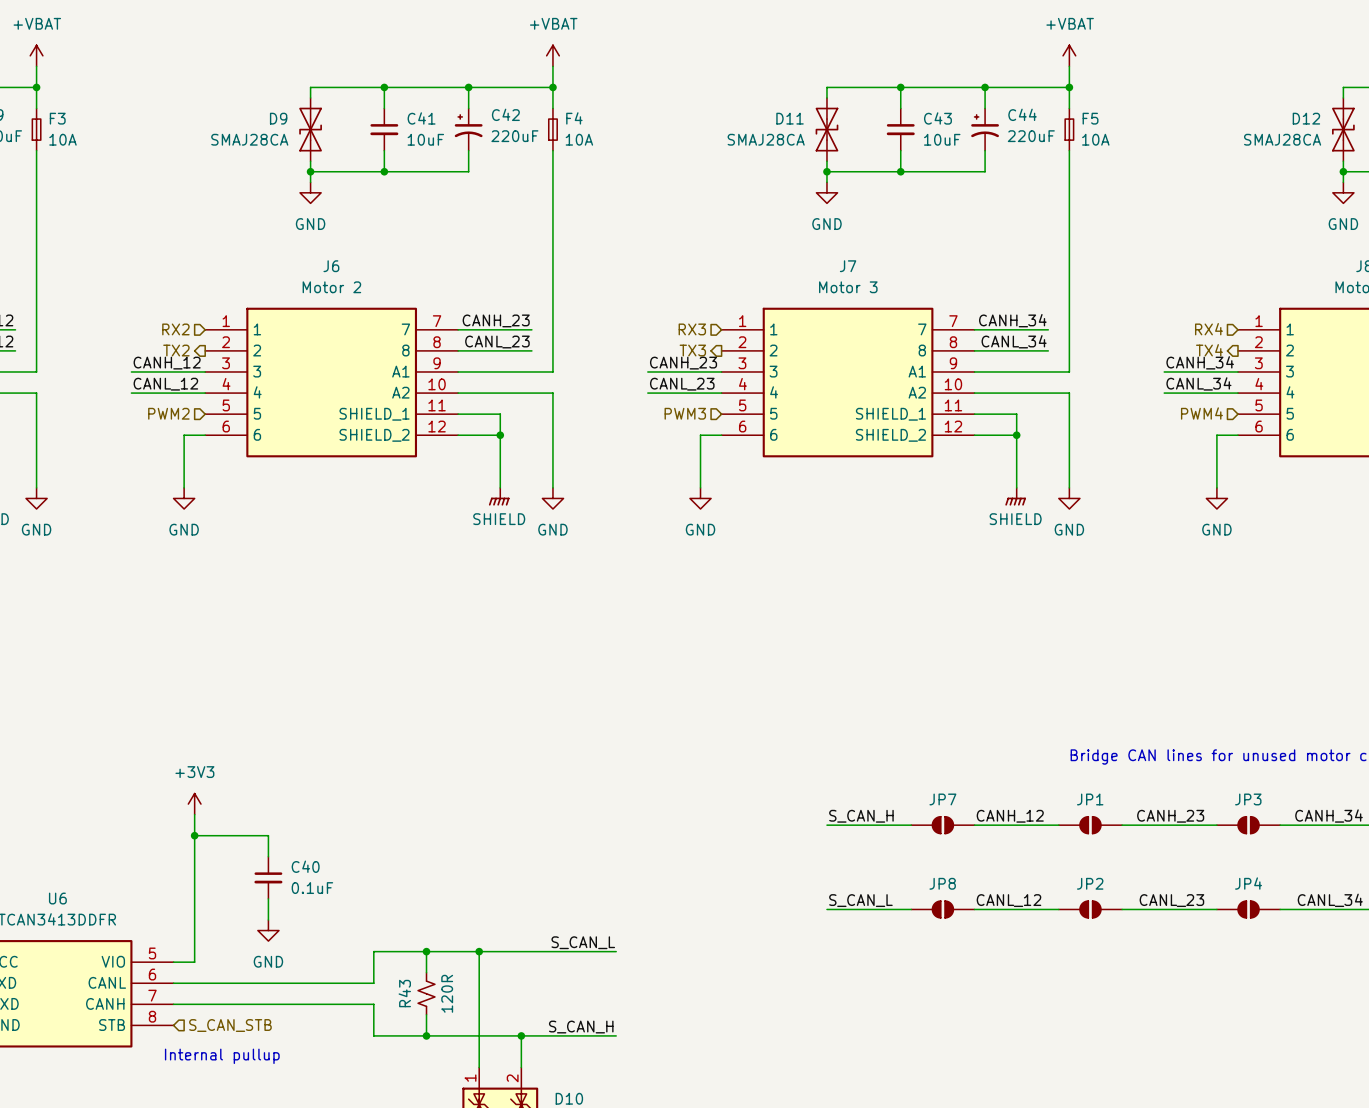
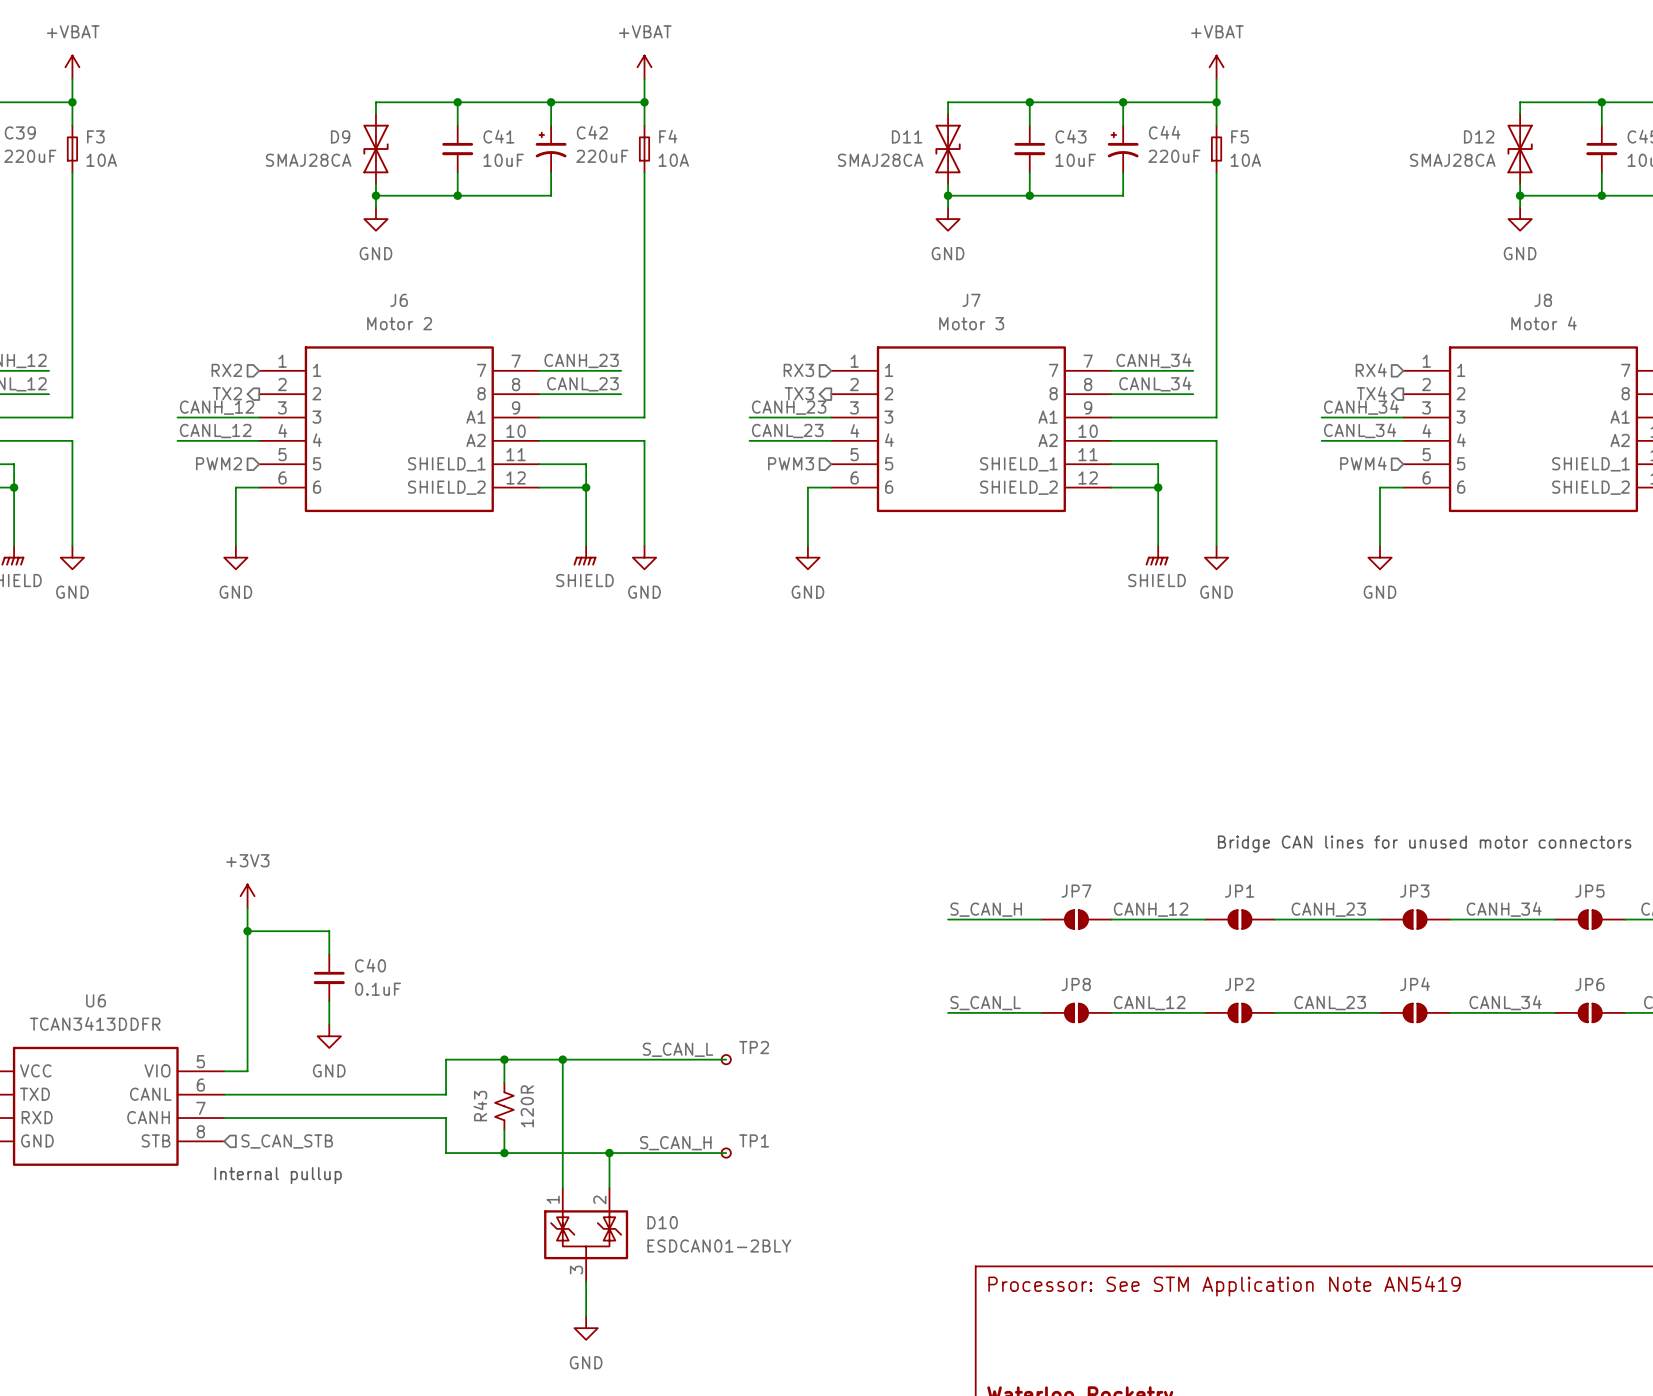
wire: none -> (714, 1059) (726, 1059)
TP2: none -> (726, 1059)
wire: none -> (714, 1153) (726, 1153)
TP1: none -> (726, 1153)

